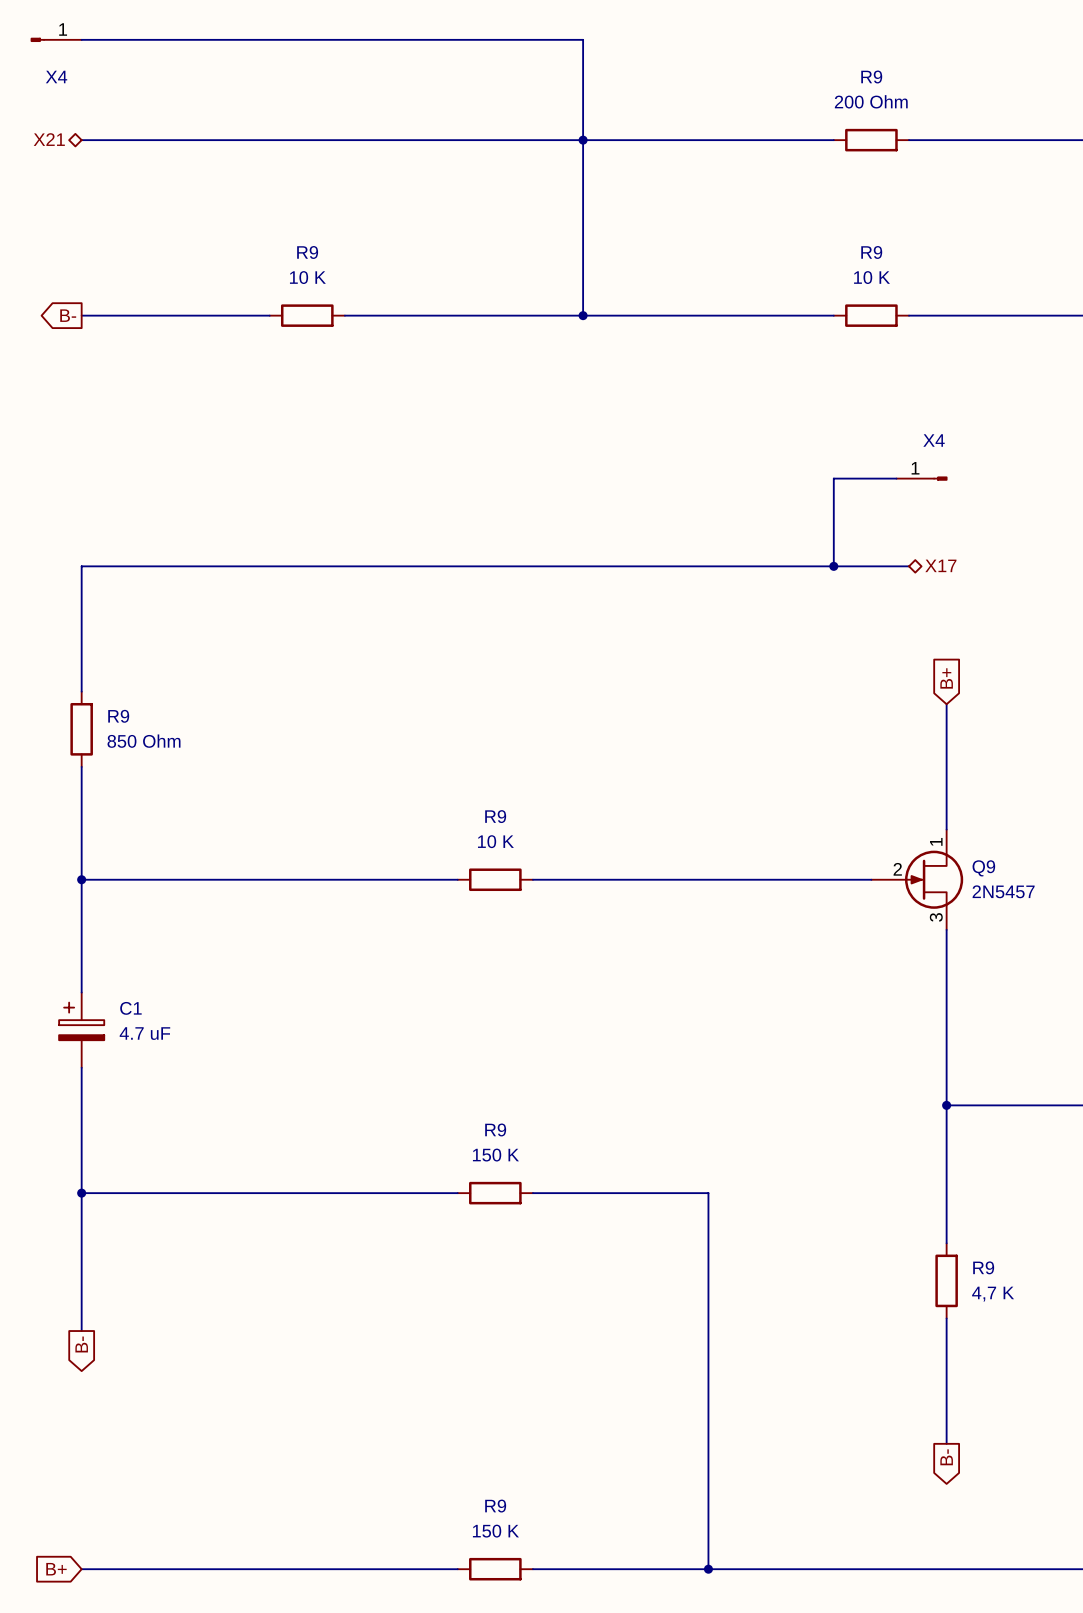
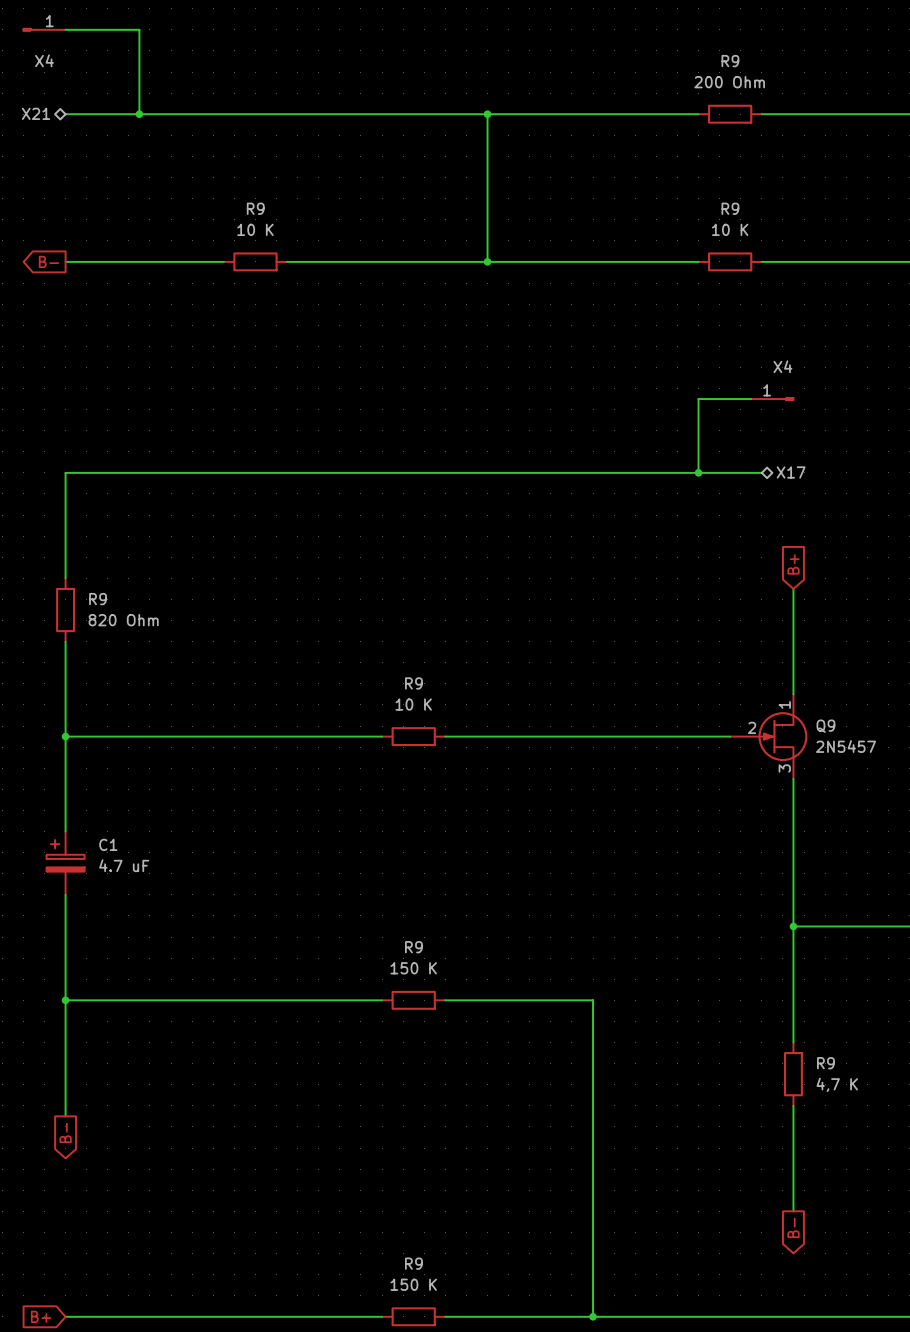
wire: (169, 39) (583, 39) (583, 140) -> (139, 29) (139, 114)
junction: none -> (139, 114)
R9 value: 850 Ohm (144, 741) -> 820 Ohm (123, 620)

